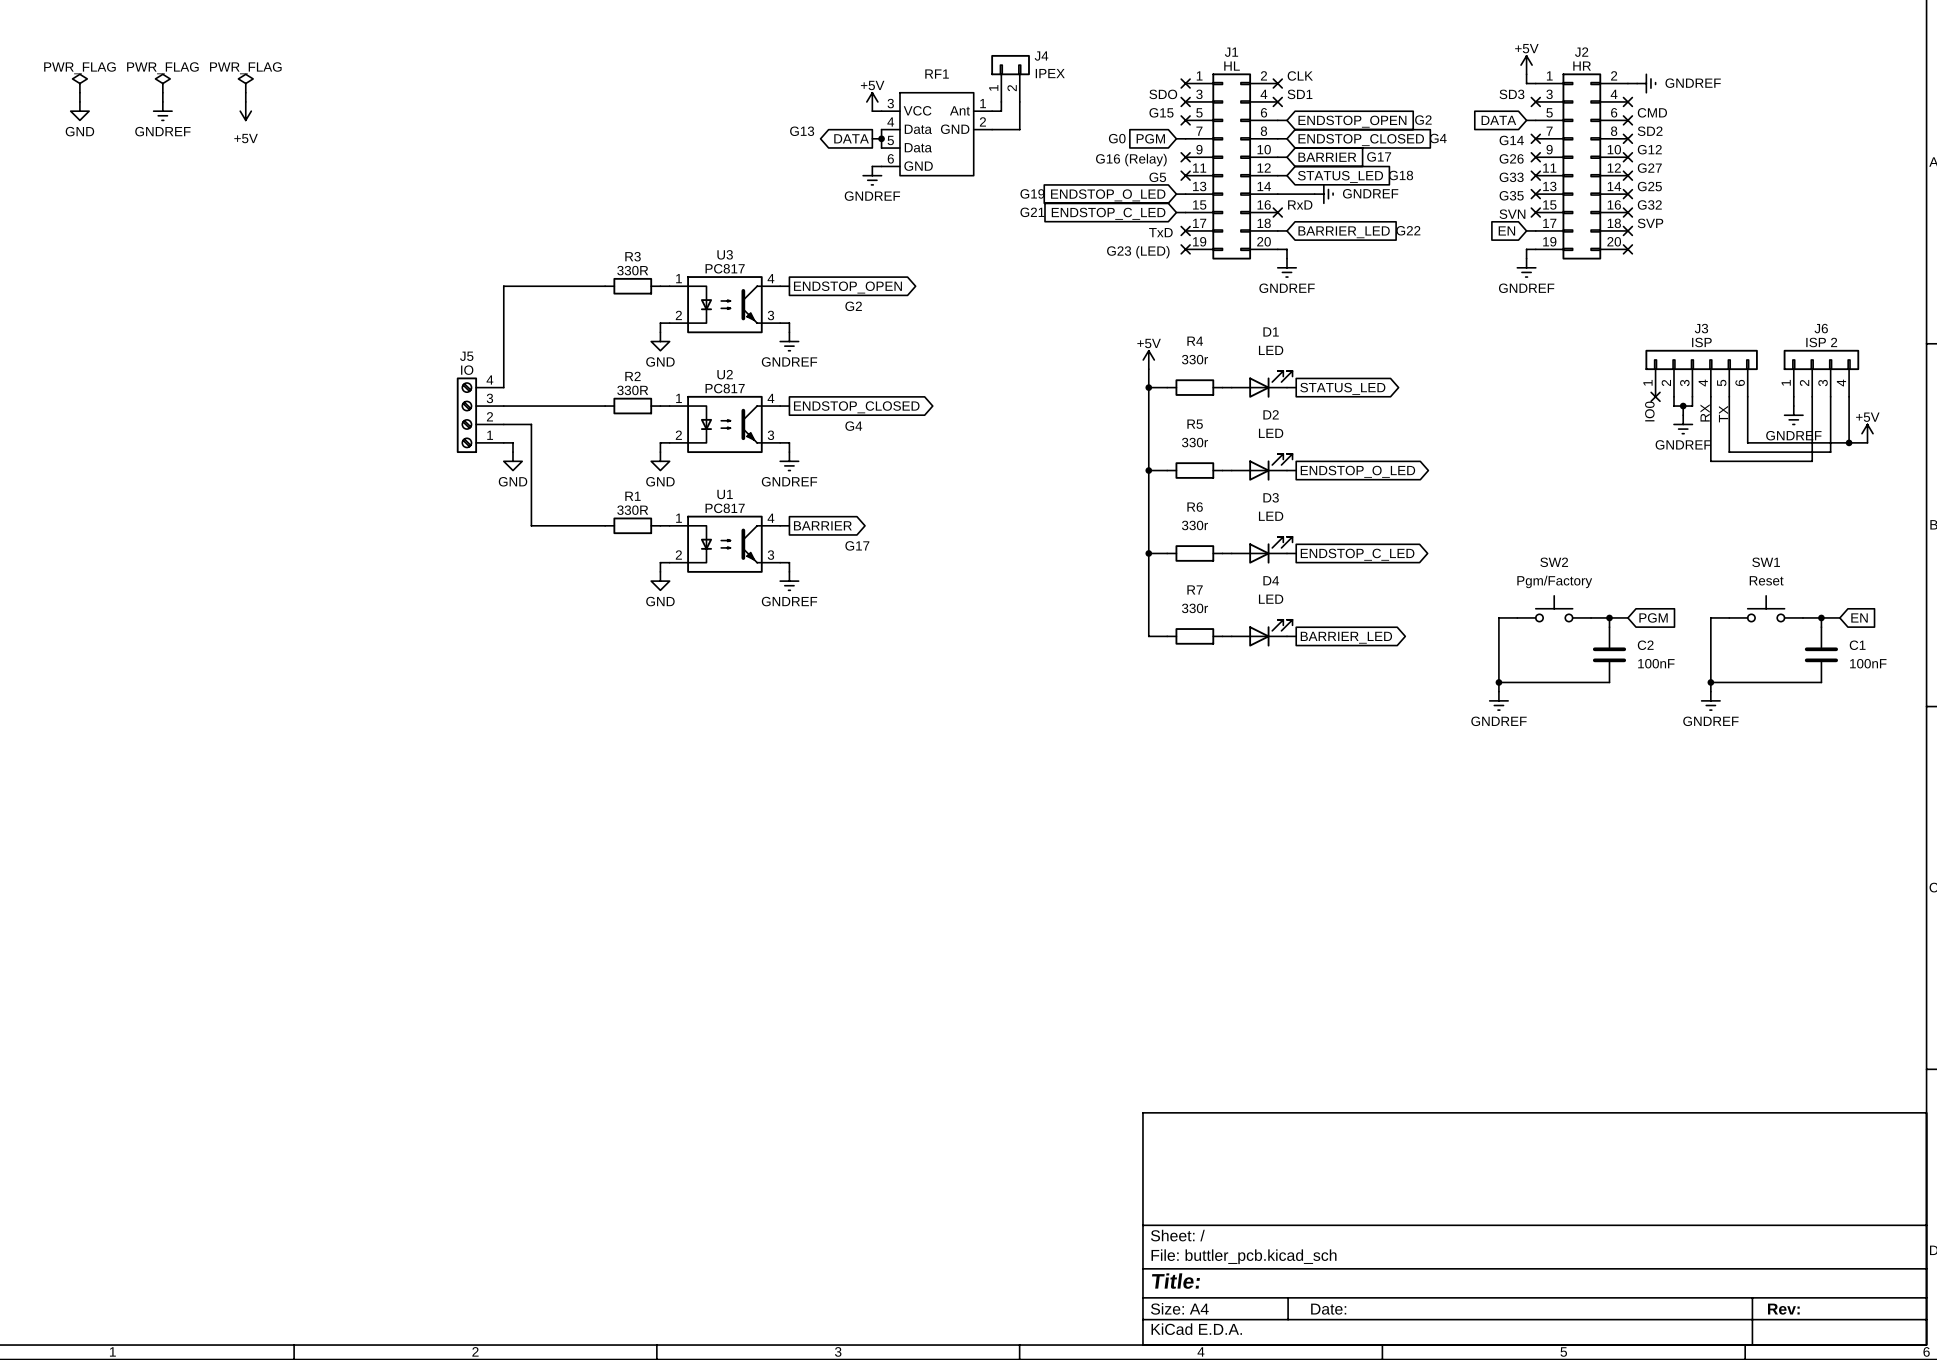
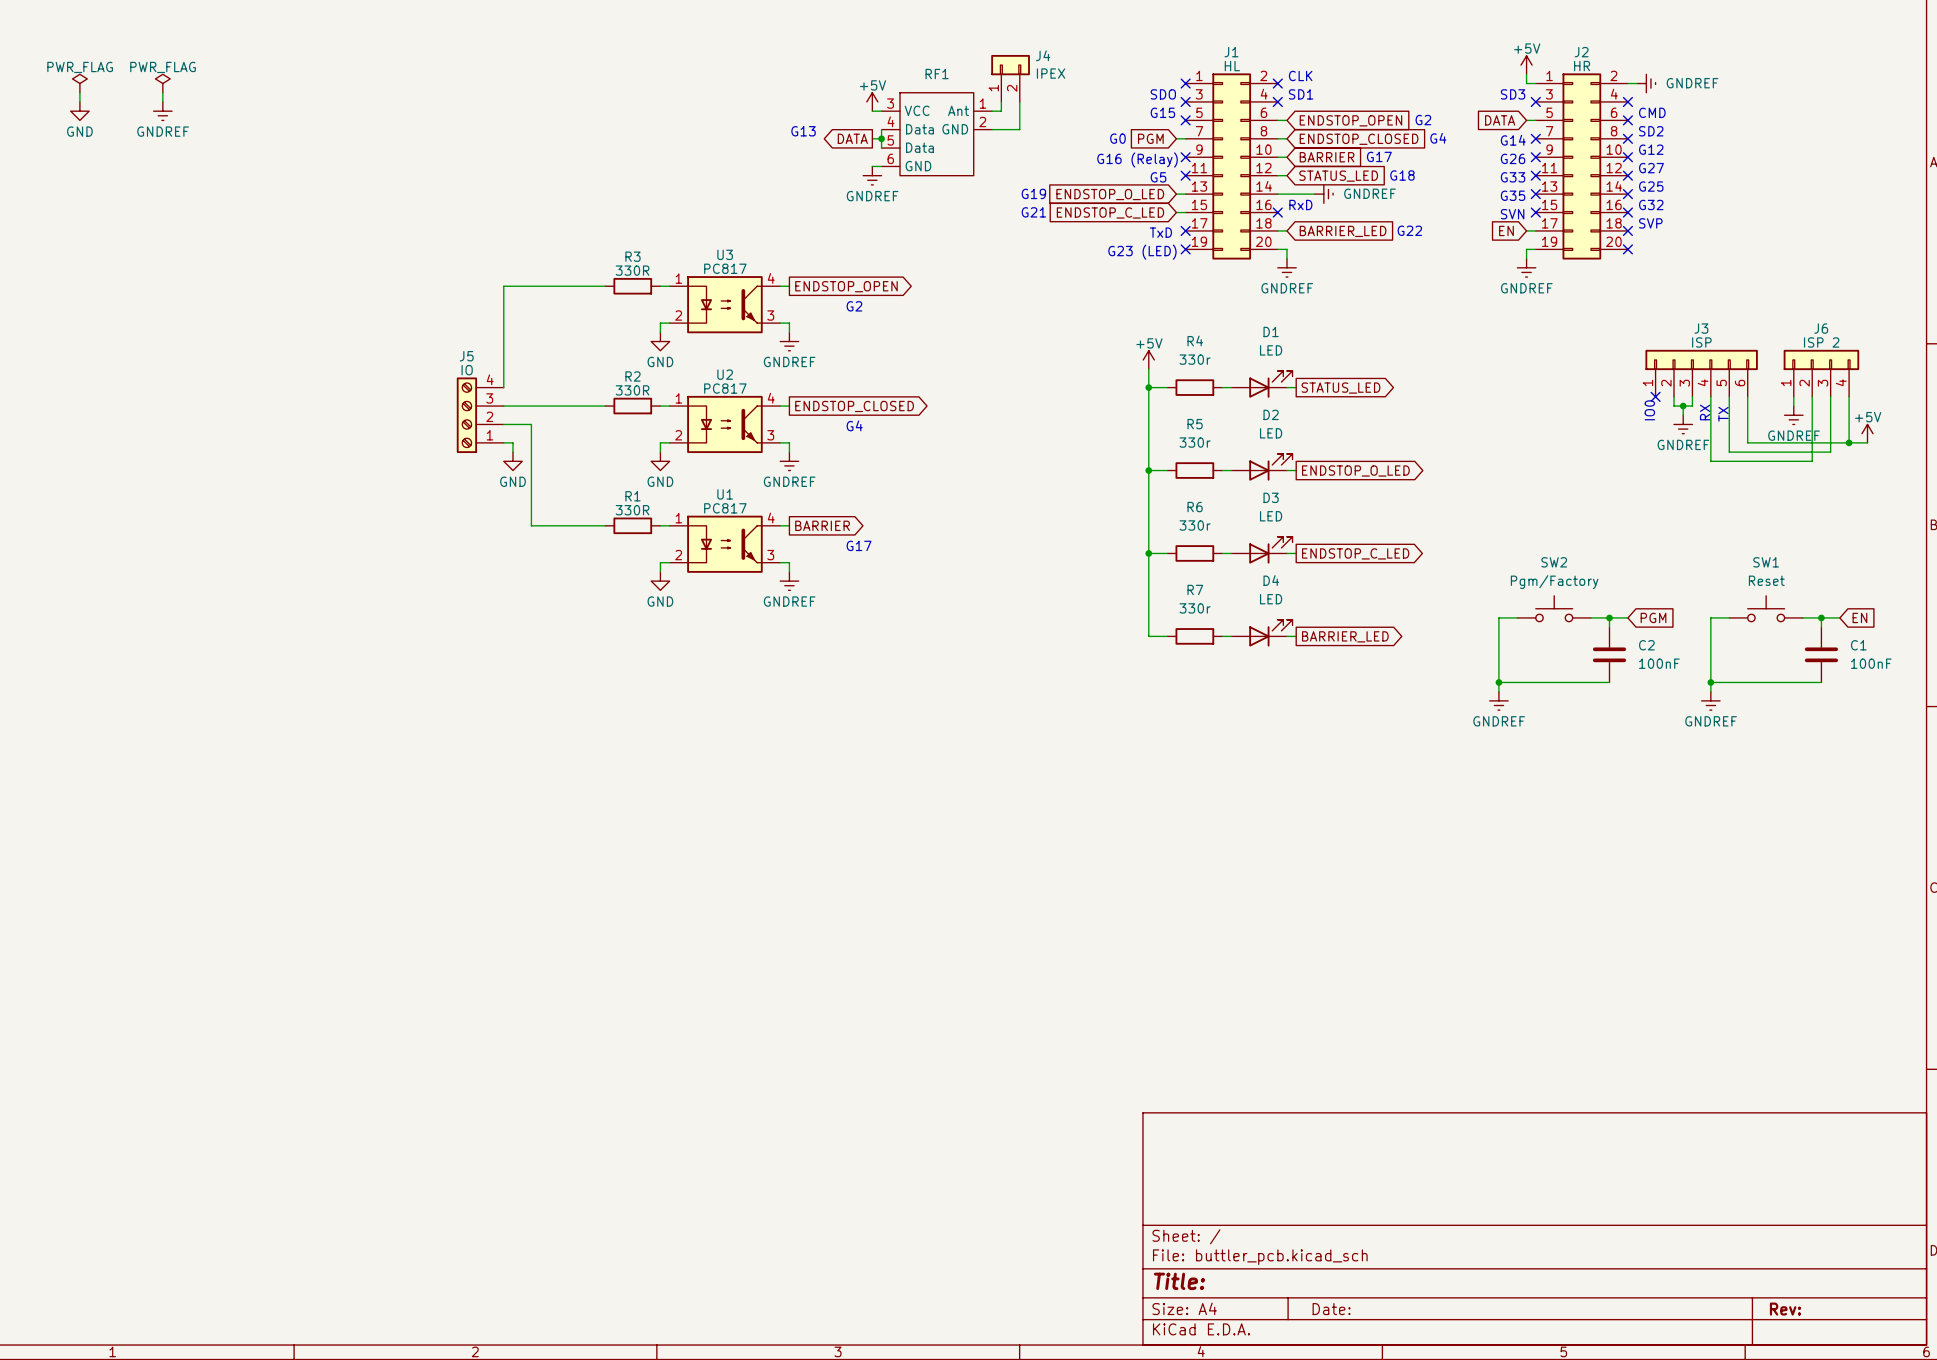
power symbol: PWR_FLAG (245, 83) -> none
wire: (245, 92) (245, 101) -> none
power symbol: +5V (245, 111) -> none

